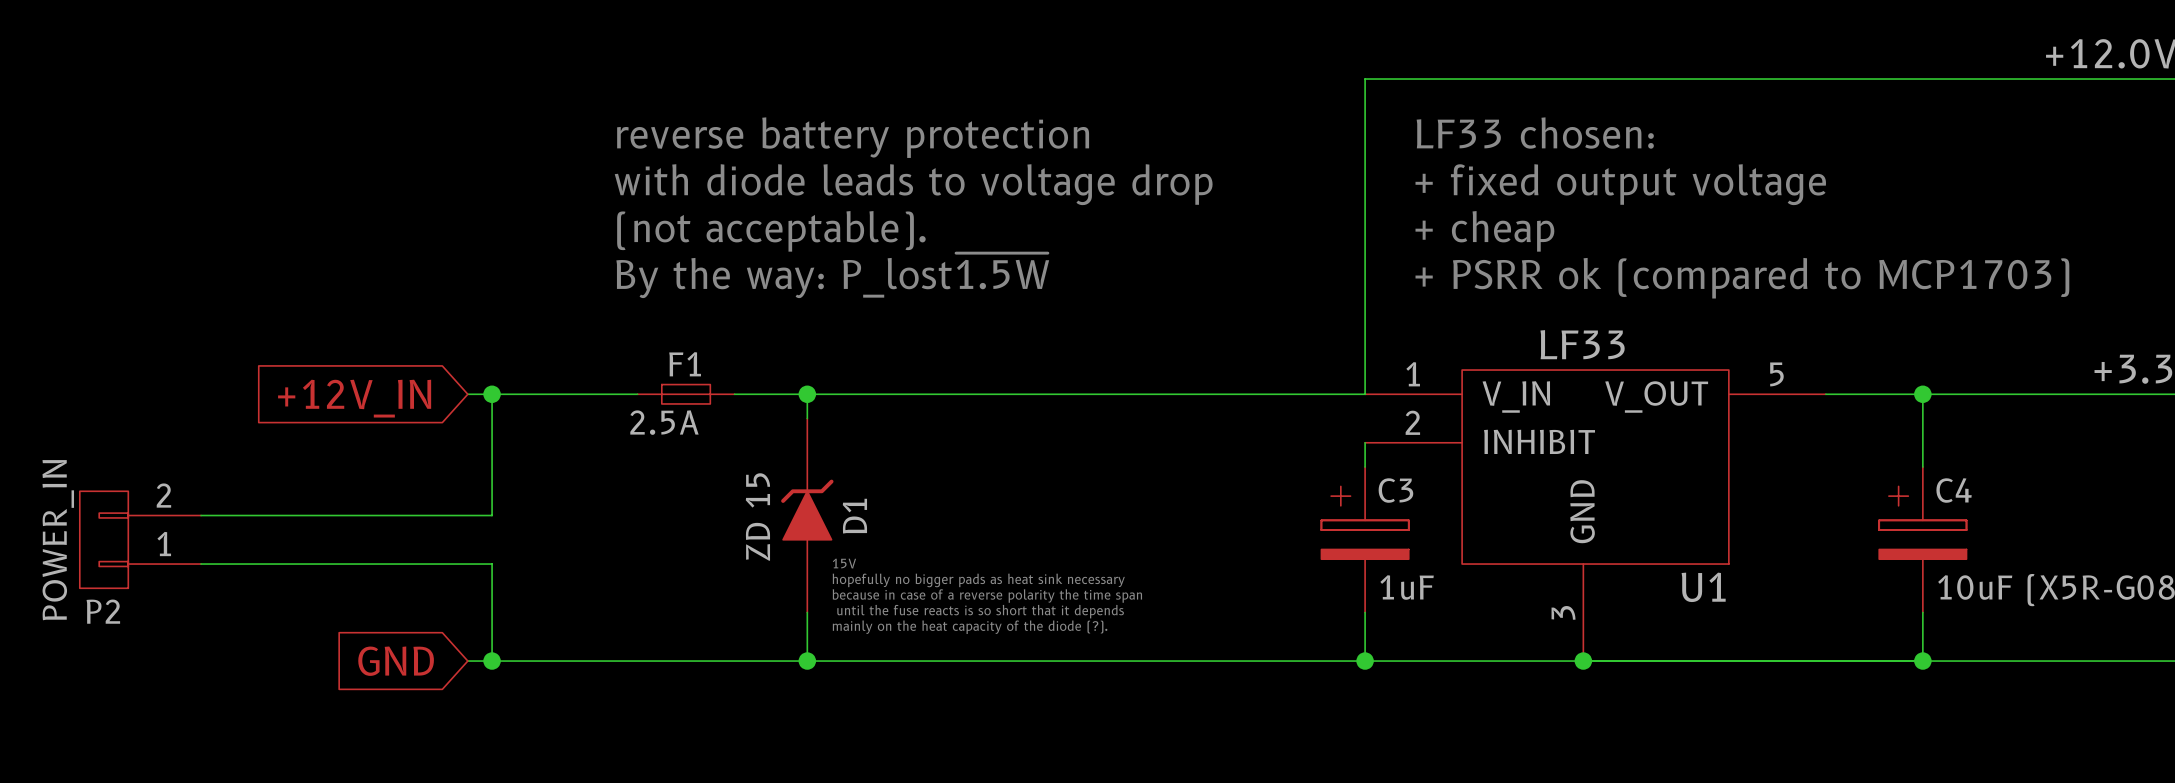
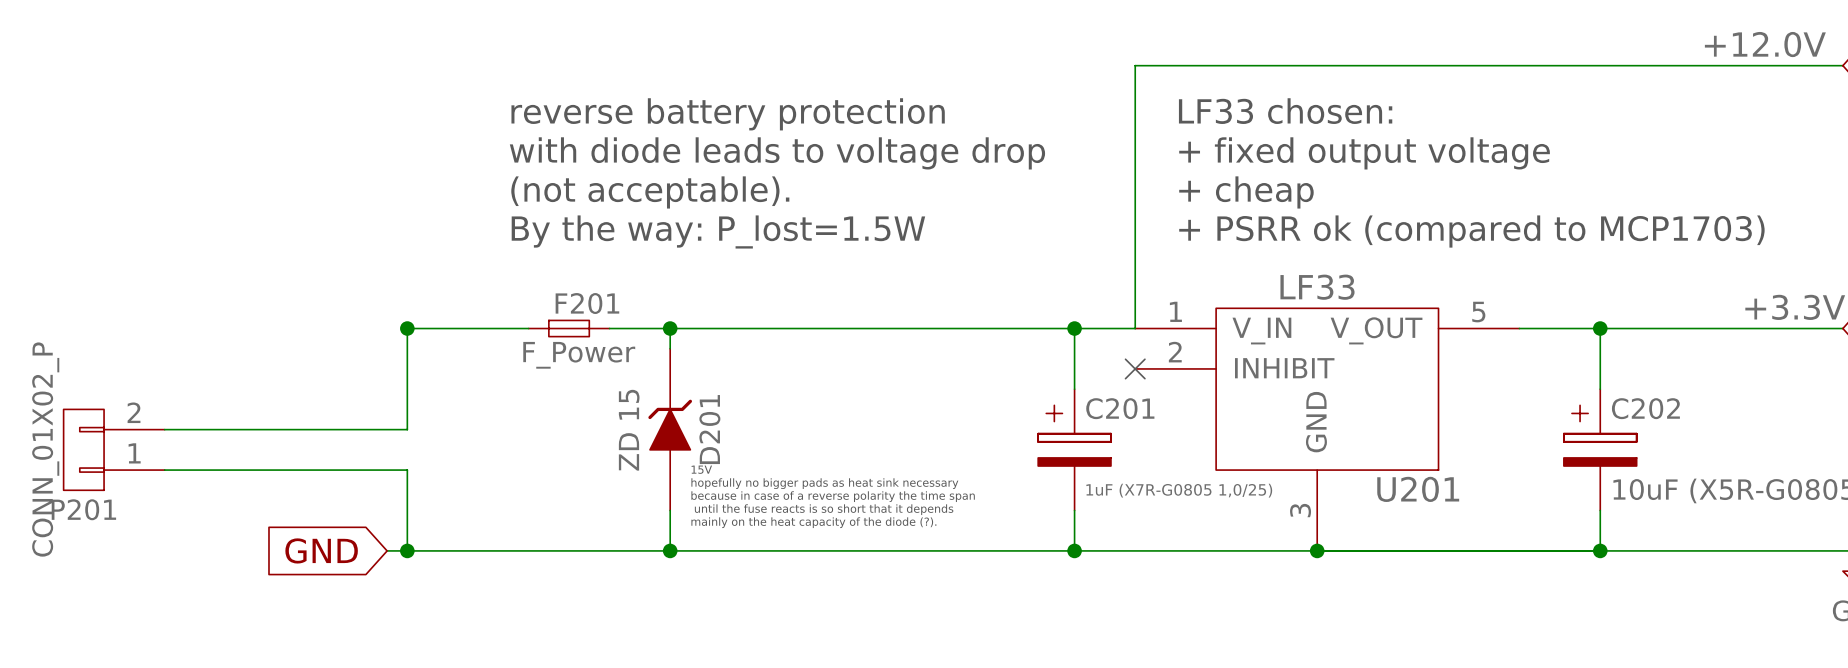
text: By the way: P_lost~{1.5W} (832, 275) -> By the way: P_lost=1.5W (718, 231)
F1 name: F1 (685, 364) -> F201 (587, 303)
wire: (467, 394) (492, 394) -> none
wire: none -> (1074, 328) (1074, 389)
junction: none -> (1074, 328)
global label: +12V_IN (354, 398) -> none
F1 value: 2.5A (664, 422) -> F_Power (579, 355)
wire: (1365, 442) (1365, 467) -> none
no-connect mark: none -> (1135, 368)
C4 name: C4 (1954, 490) -> C202 (1645, 408)
D1 name: D1 (854, 516) -> D201 (709, 429)
C201: none -> 1uF (X7R-G0805 1,0/25) (1074, 449)
C3: 1uF (1365, 539) -> none
P2 value: POWER_IN (58, 540) -> CONN_01X02_P (45, 449)
U1 name: U1 (1703, 587) -> U201 (1418, 489)
P2 name: P2 (103, 611) -> P201 (83, 509)
wire: (1365, 612) (1365, 661) -> (1074, 510) (1074, 550)
junction position: (1365, 661) -> (1074, 550)

